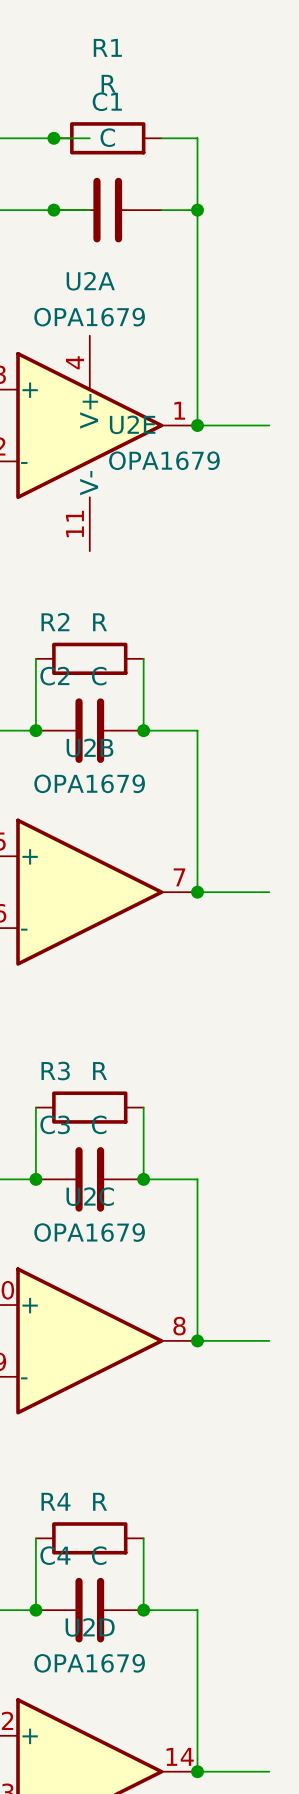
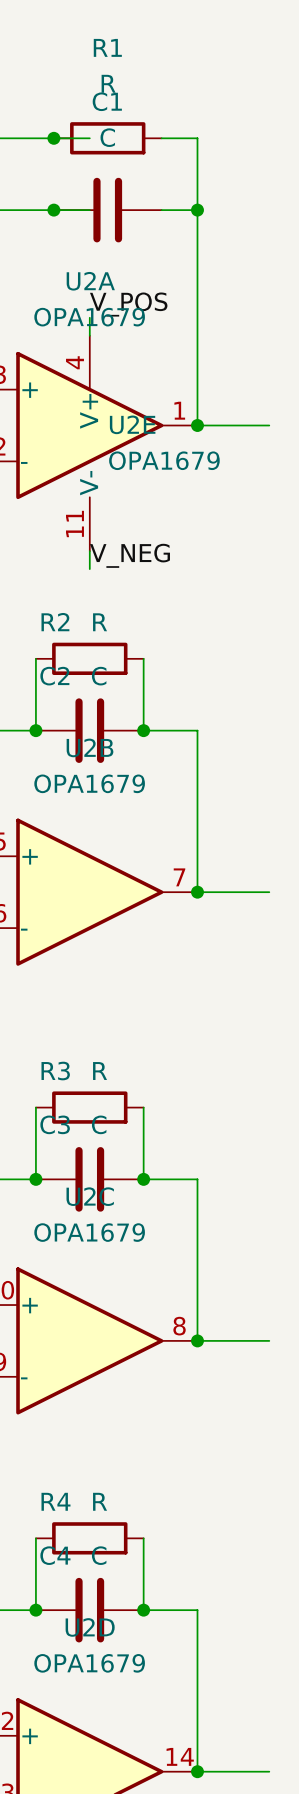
label: none -> V_POS (128, 304)
wire: none -> (89, 317) (89, 335)
wire: none -> (89, 551) (89, 569)
label: none -> V_NEG (129, 555)

